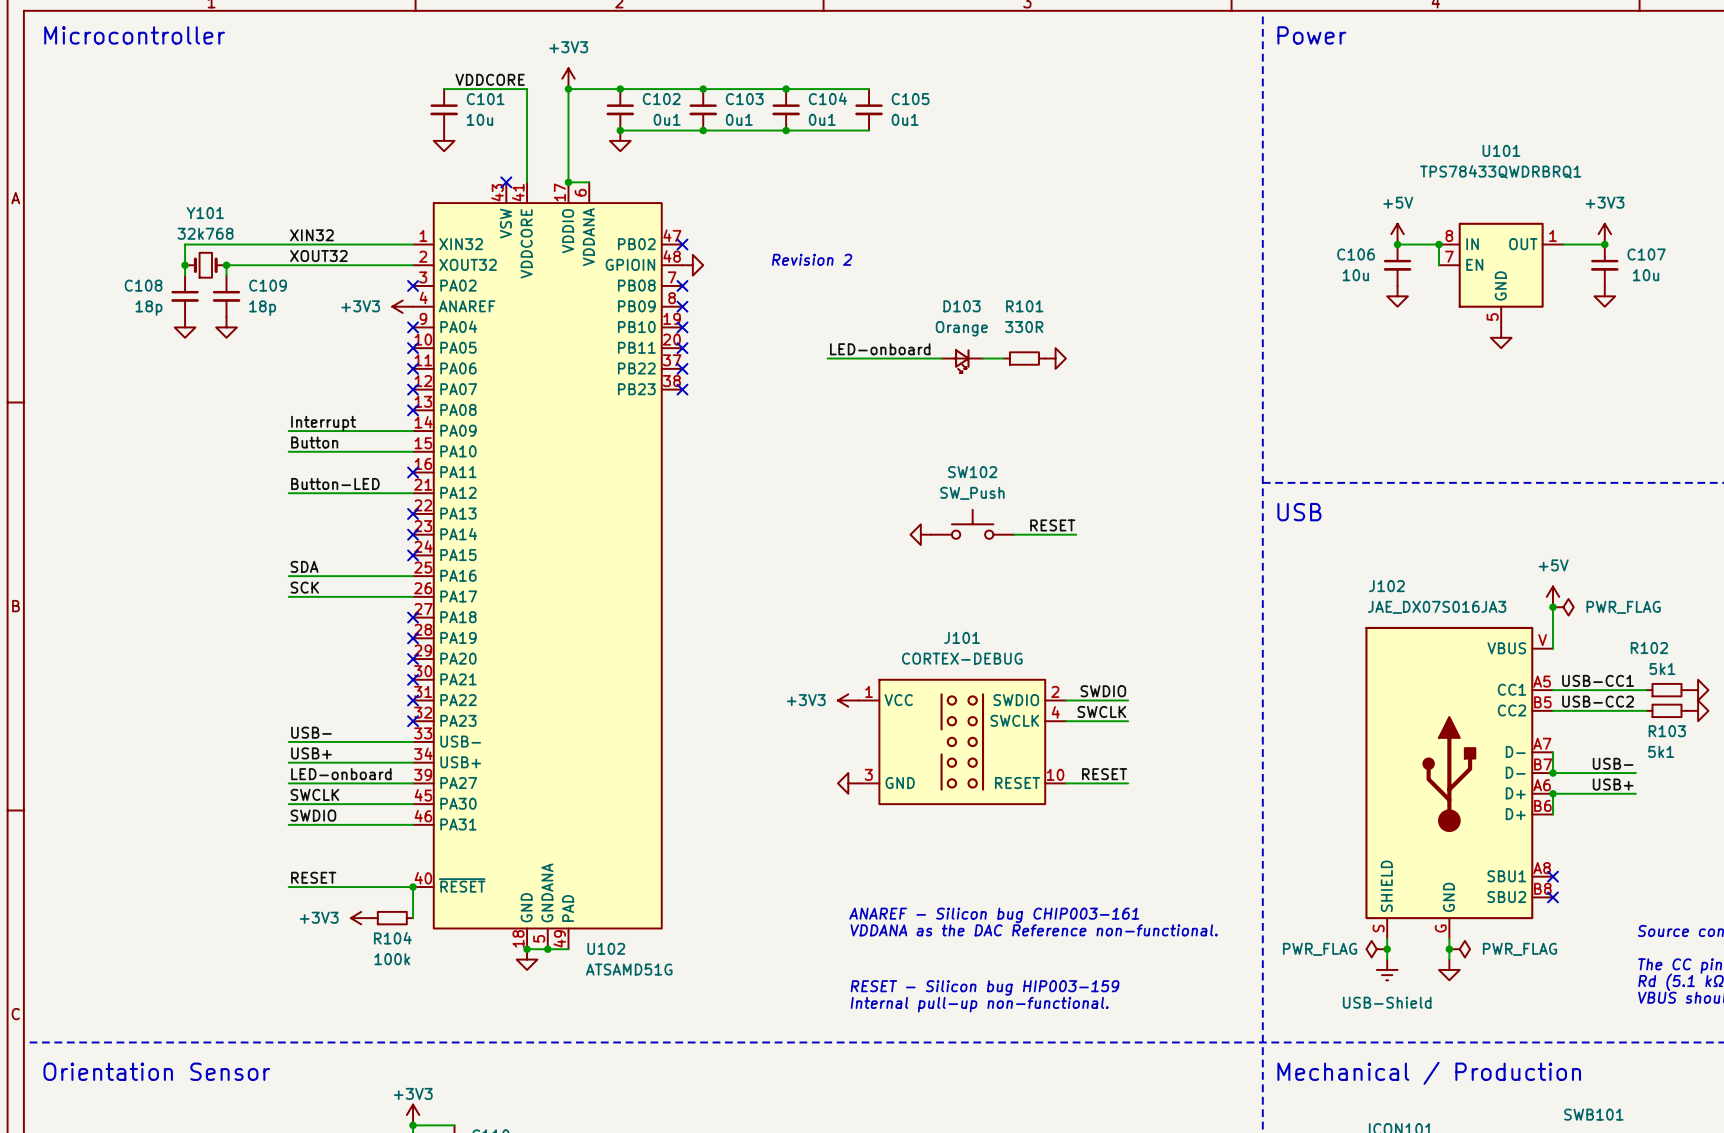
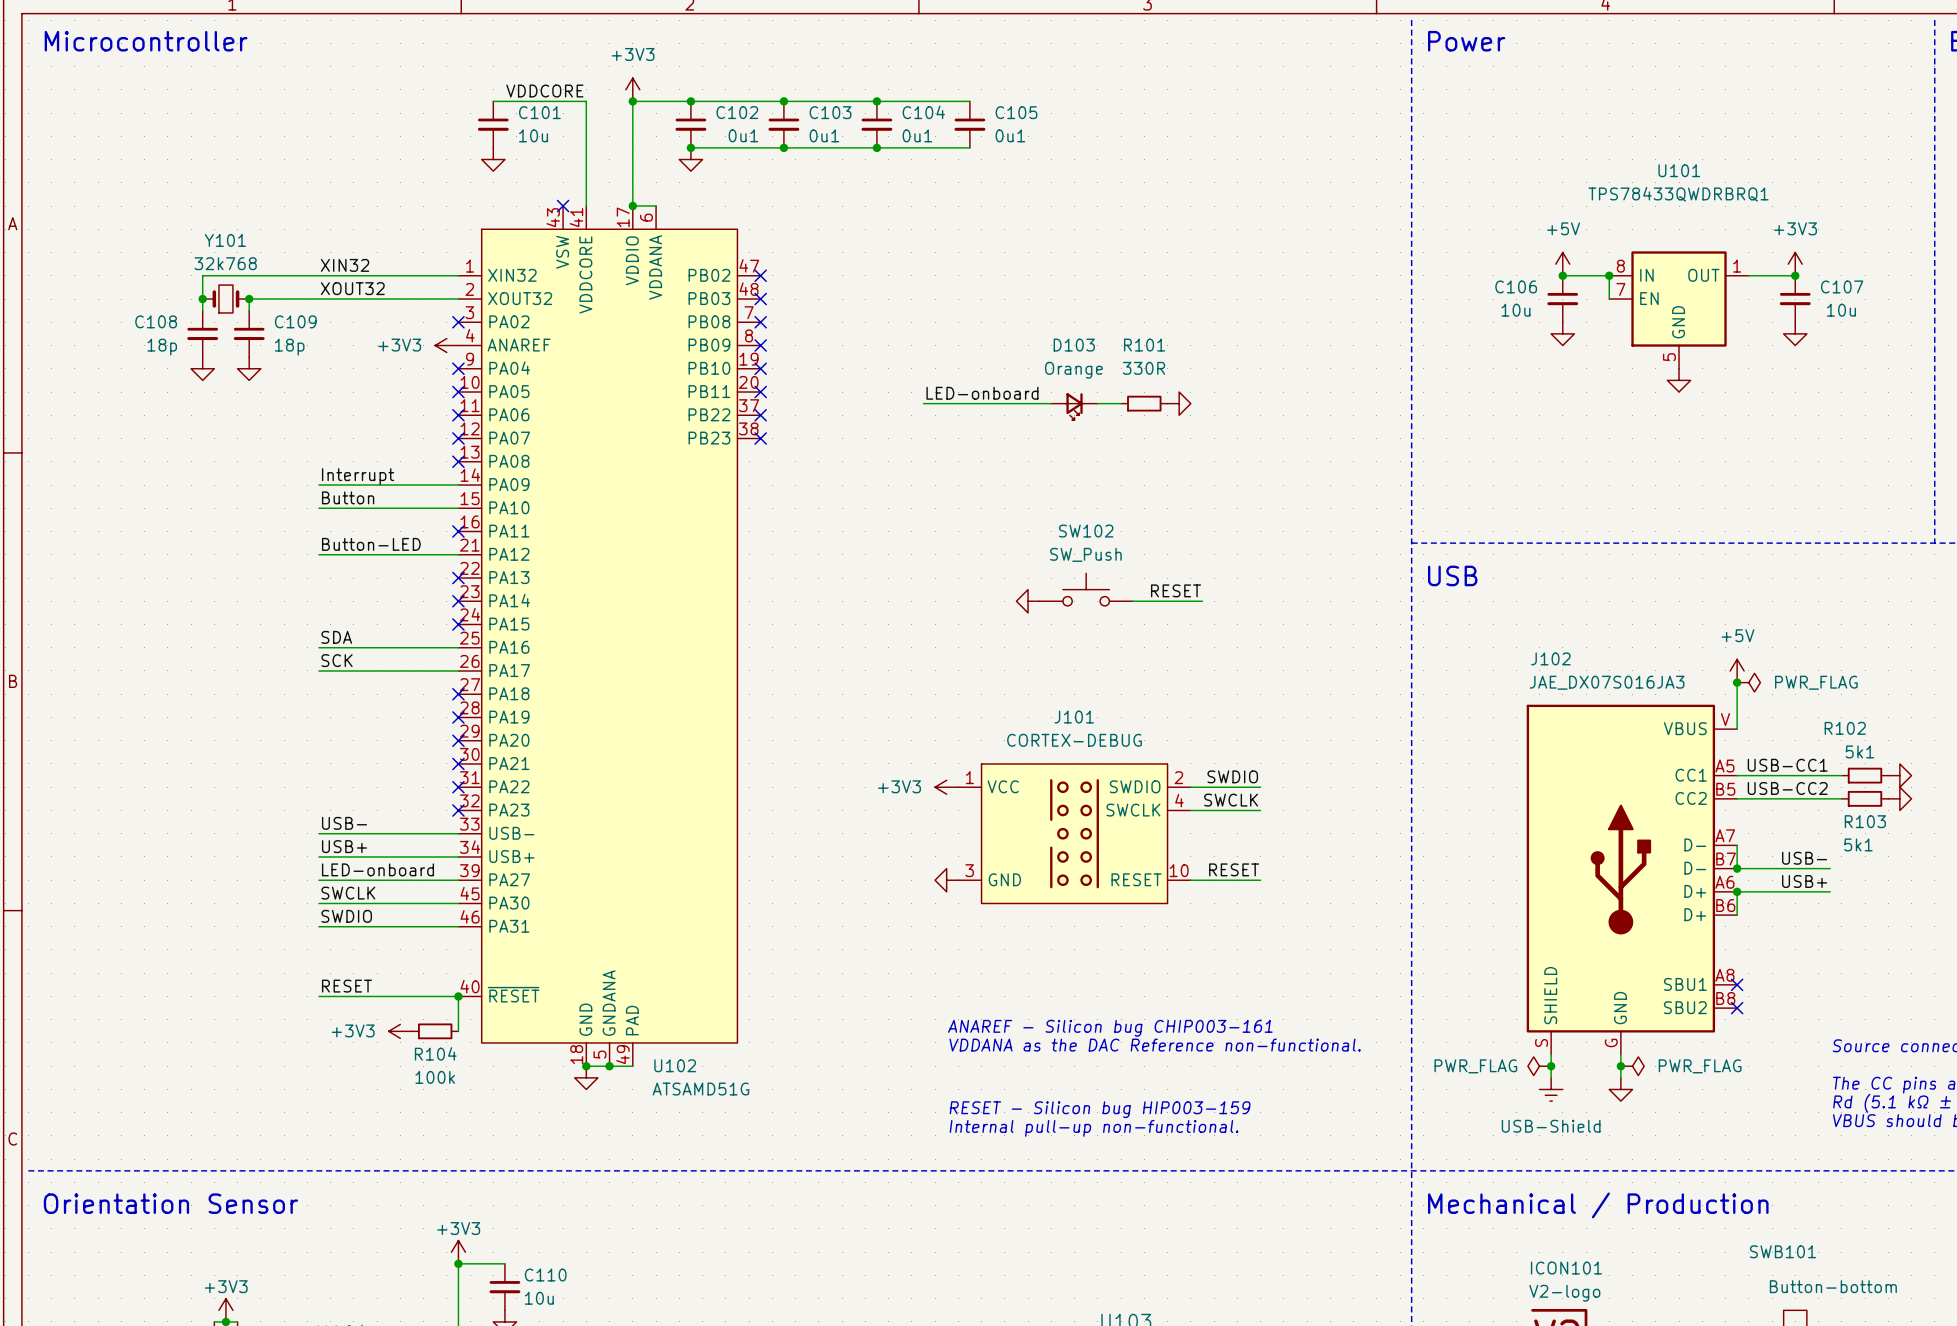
text: Revision 2 (812, 259) -> none
U102 pin name: GPIOIN (630, 264) -> PB03 (709, 298)
no-connect mark: none -> (760, 299)
power symbol: (692, 265) -> none

